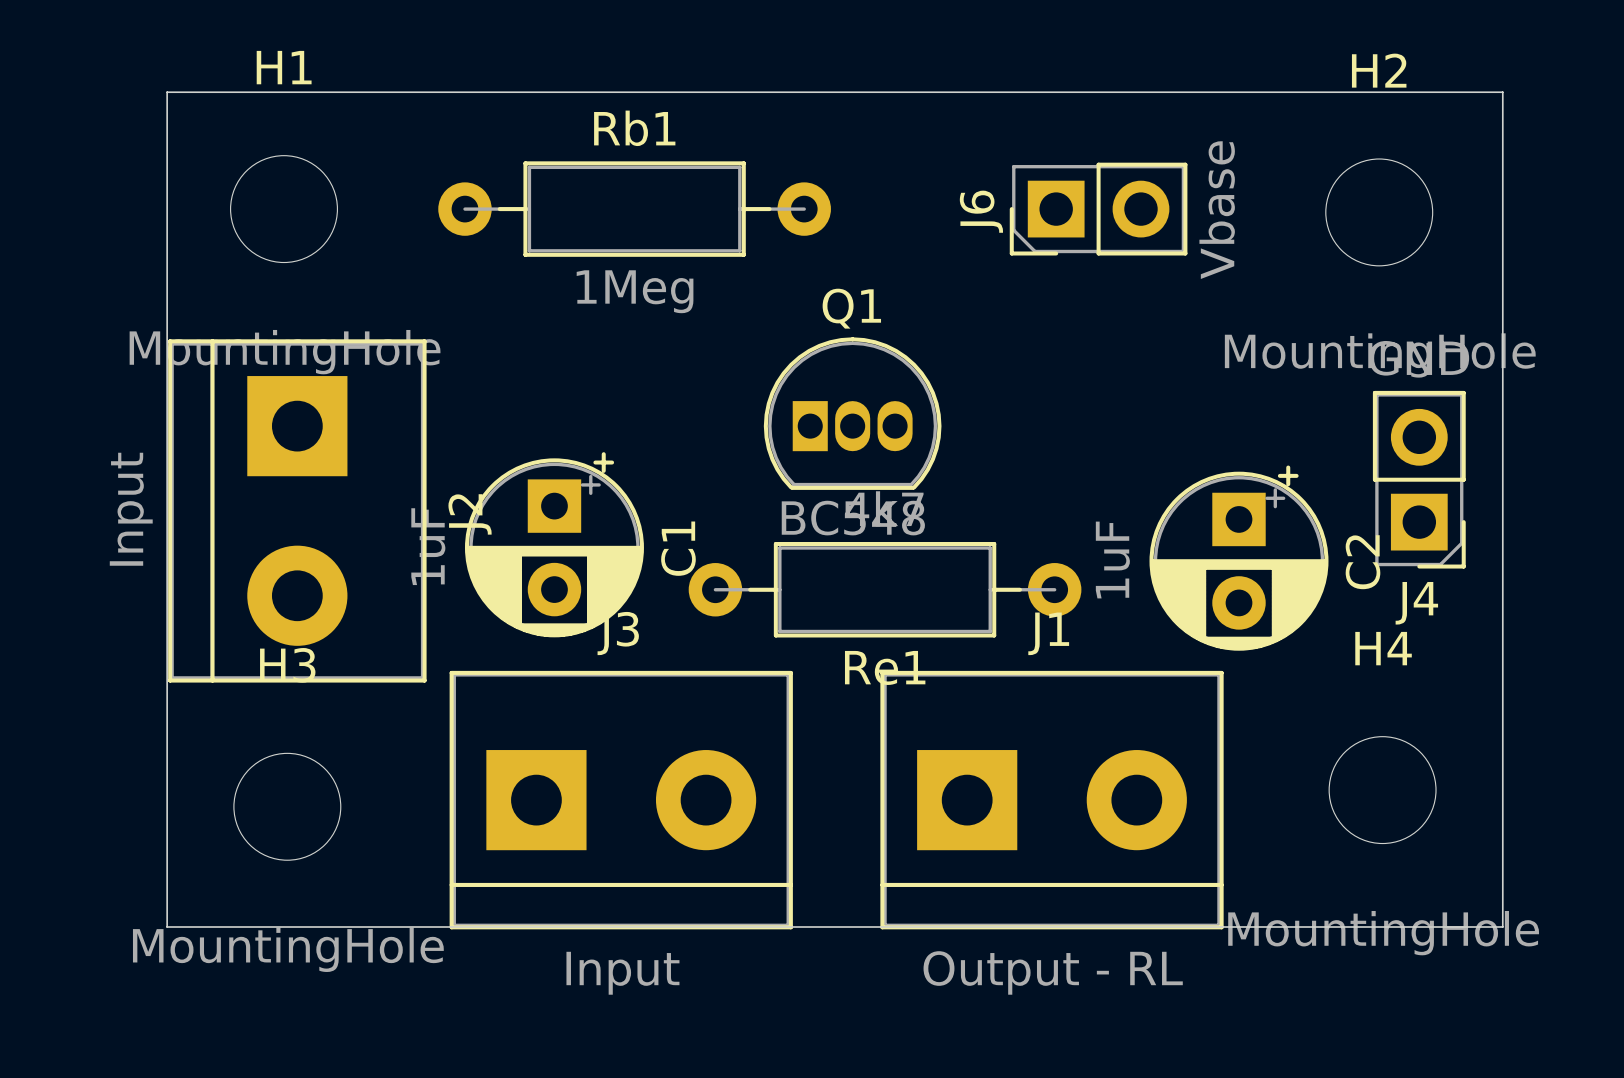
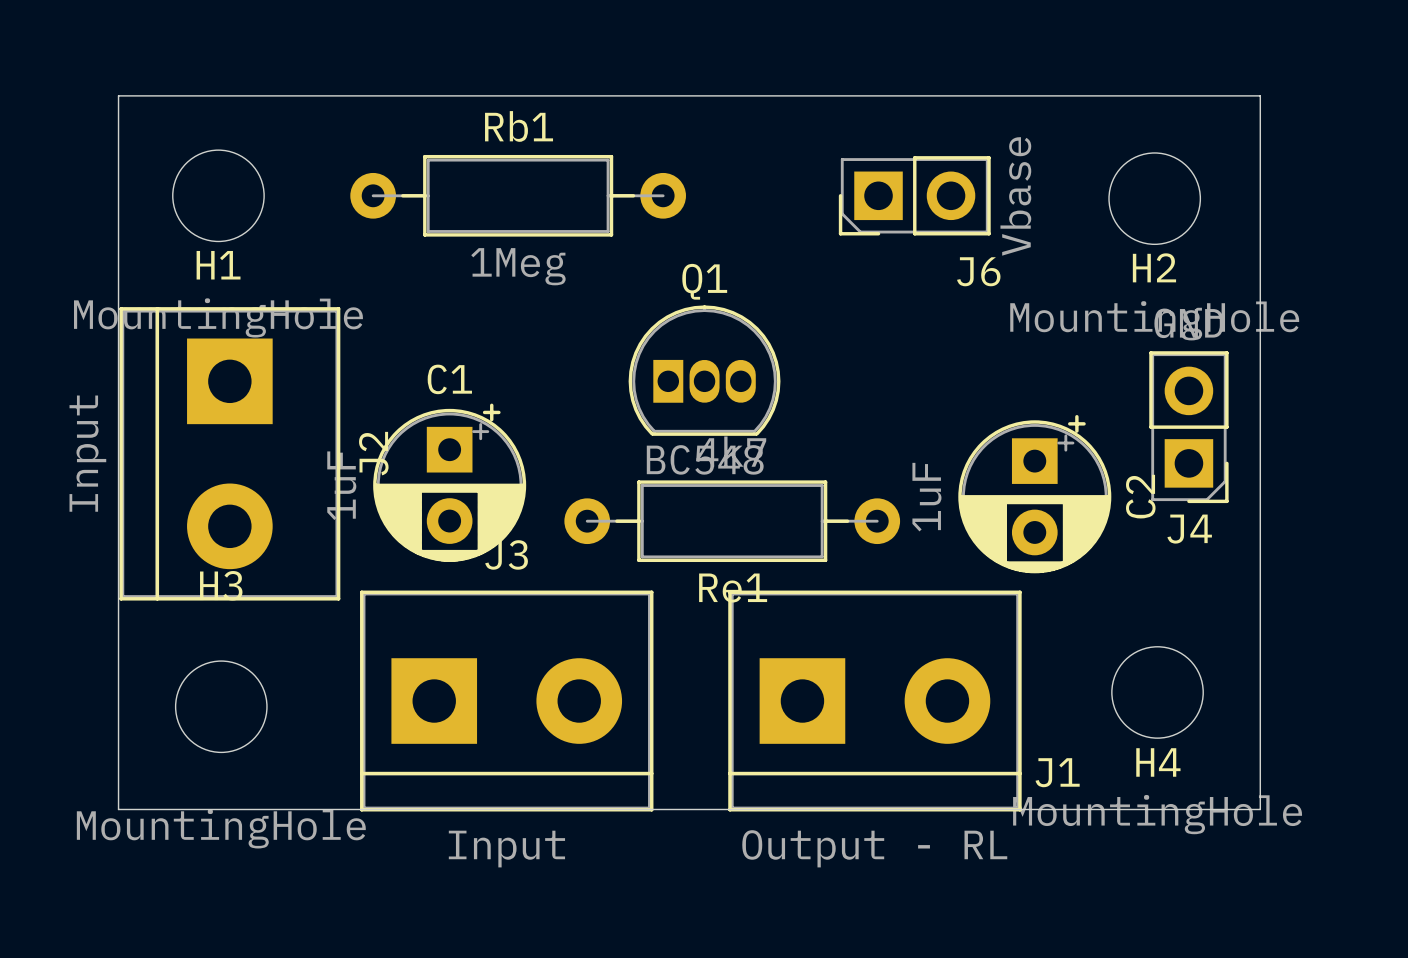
H1 name position: H1 (284, 67) -> H1 (218, 265)
H2 name position: H2 (1379, 70) -> H2 (1154, 267)
J6 name rotation: 0° (981, 211) -> 90° clockwise (978, 271)
J6 name position: J6 (981, 211) -> J6 (978, 271)
C1 name rotation: 0° (678, 548) -> 90° clockwise (449, 379)
C1 name position: C1 (678, 548) -> C1 (449, 379)
J1 name position: J1 (1048, 633) -> J1 (1057, 772)
H4 name position: H4 (1383, 648) -> H4 (1158, 762)

